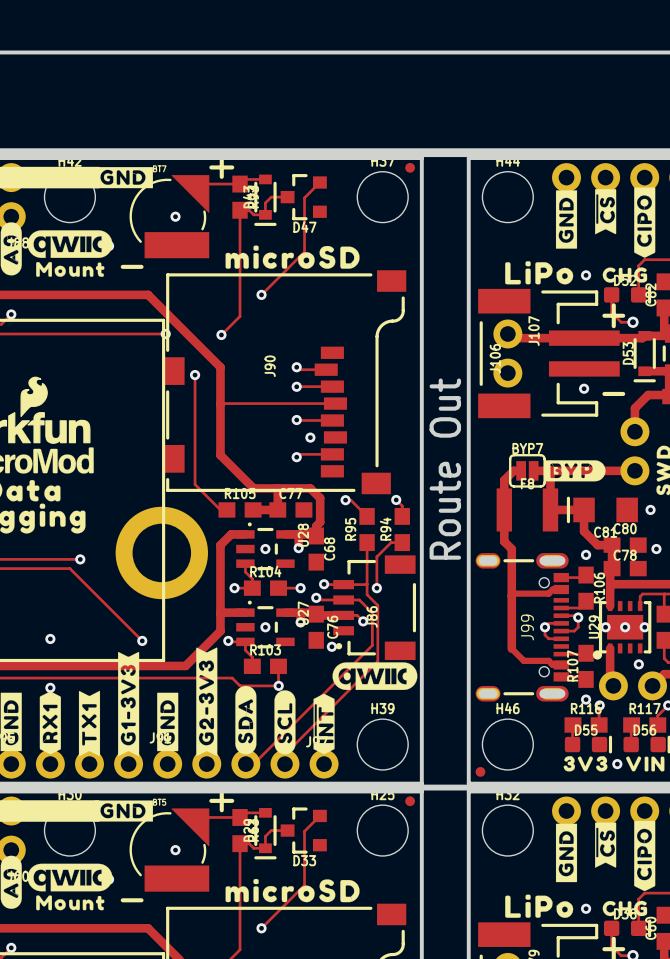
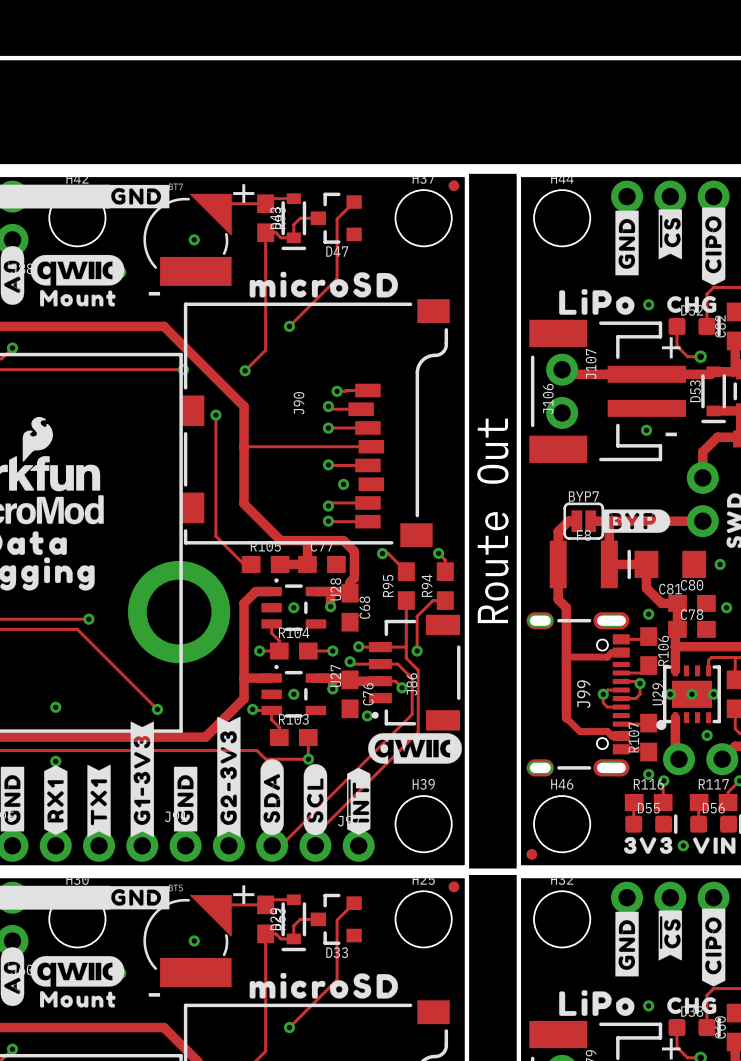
track: none -> (367, 390) (337, 391)
via: none -> (337, 391)
track: none -> (328, 521) (367, 521)
via: none -> (328, 521)

